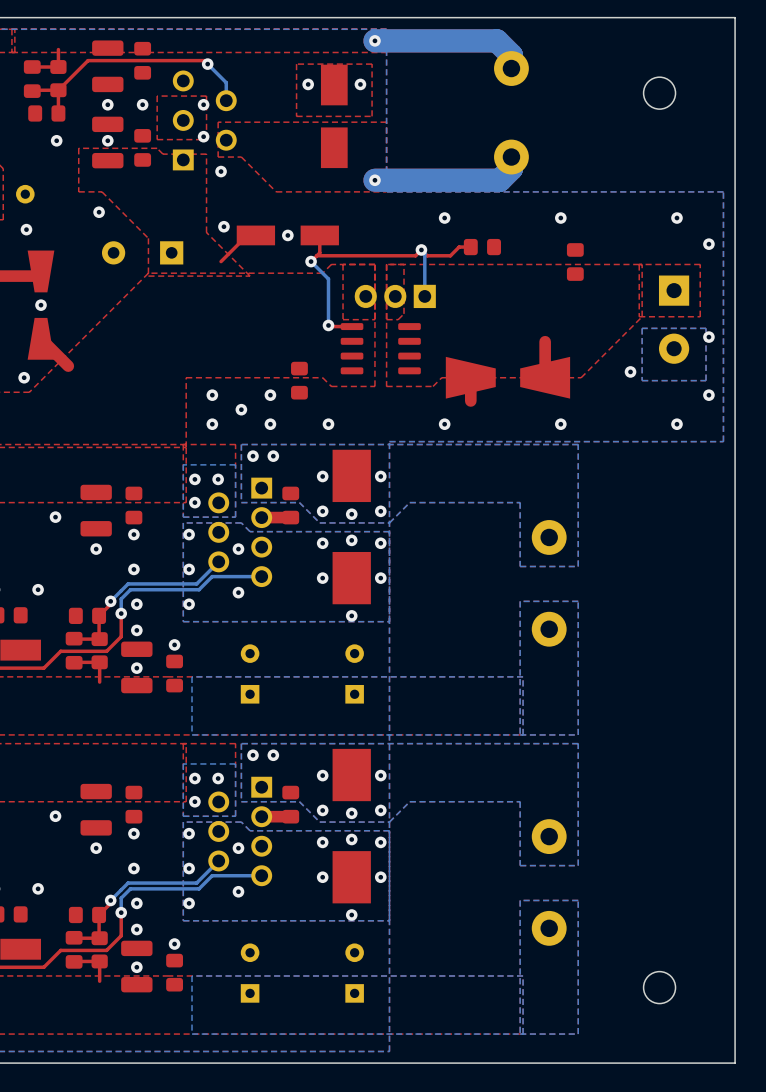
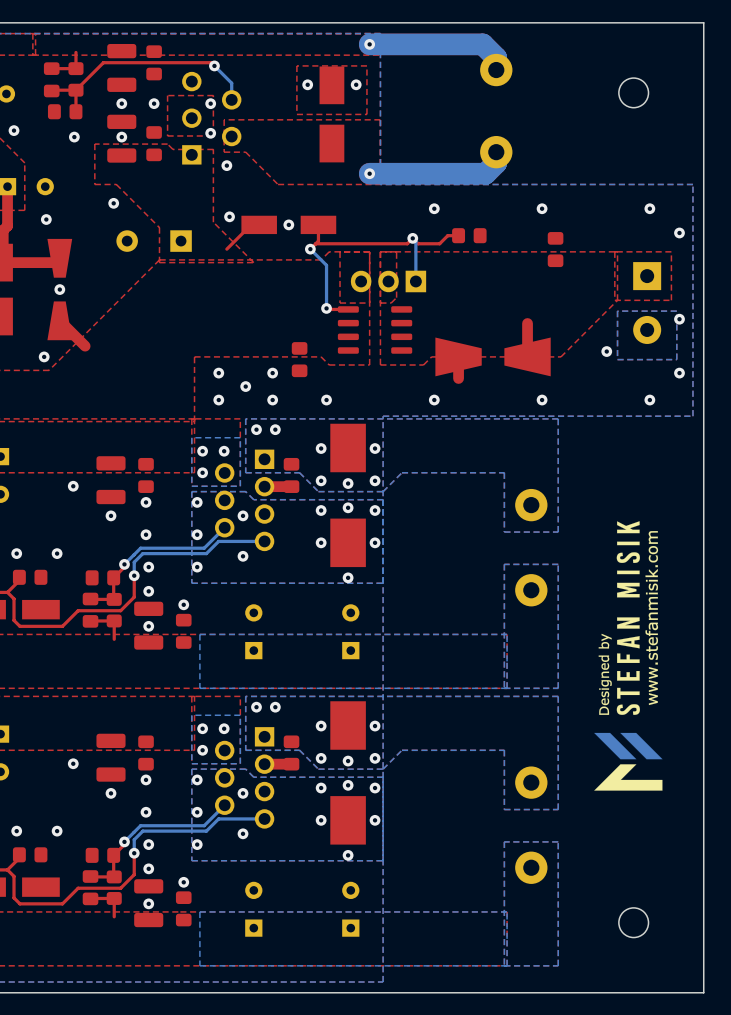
drawing: none -> [594, 521, 663, 791]

